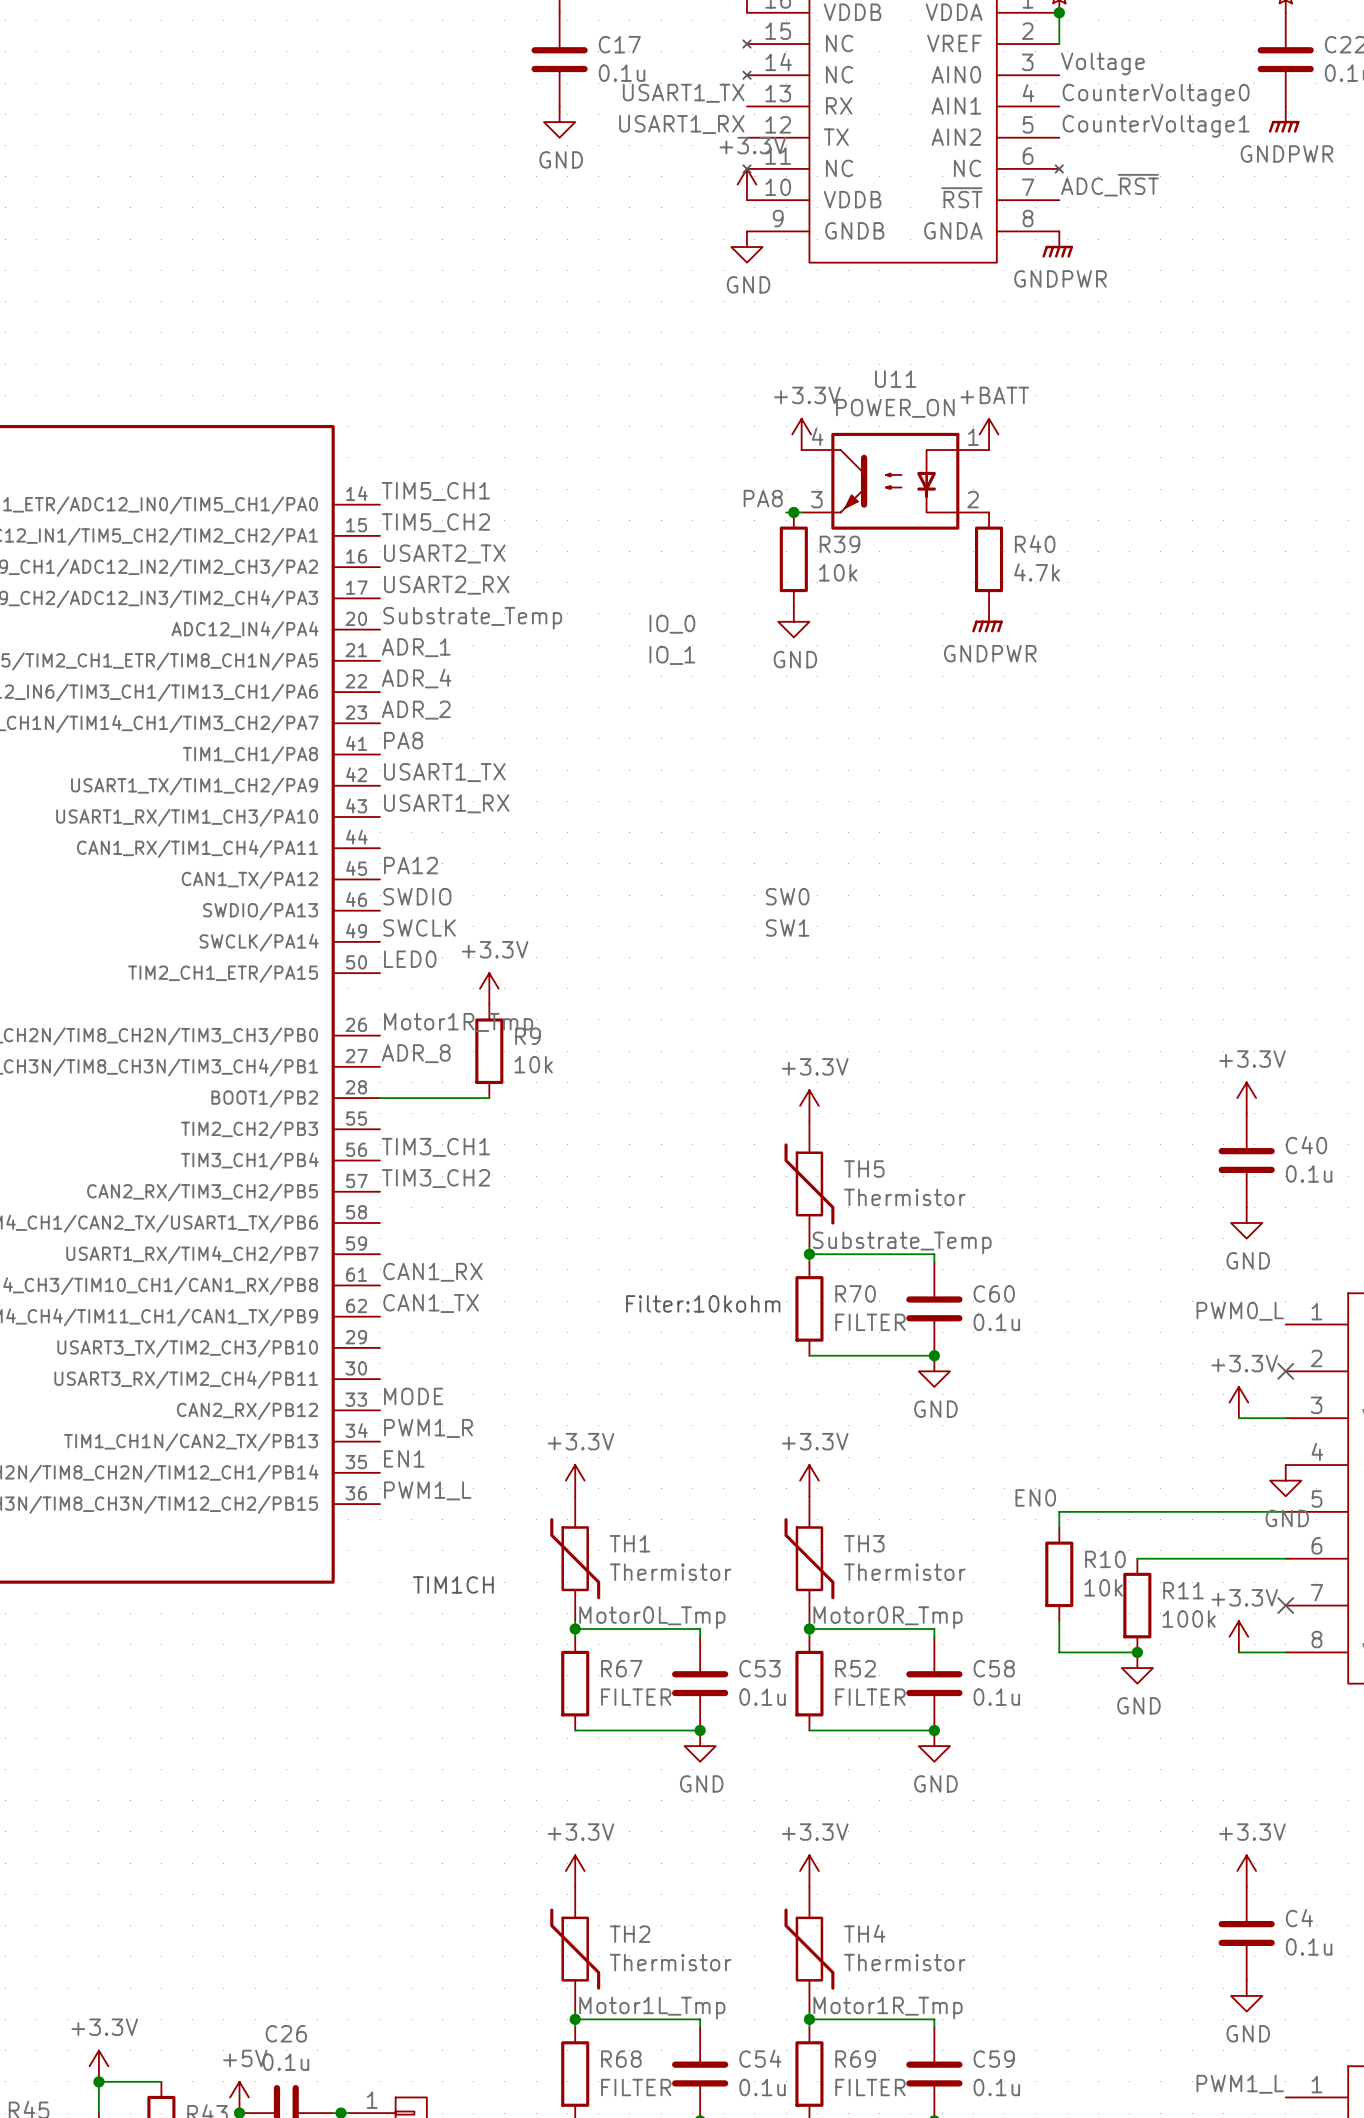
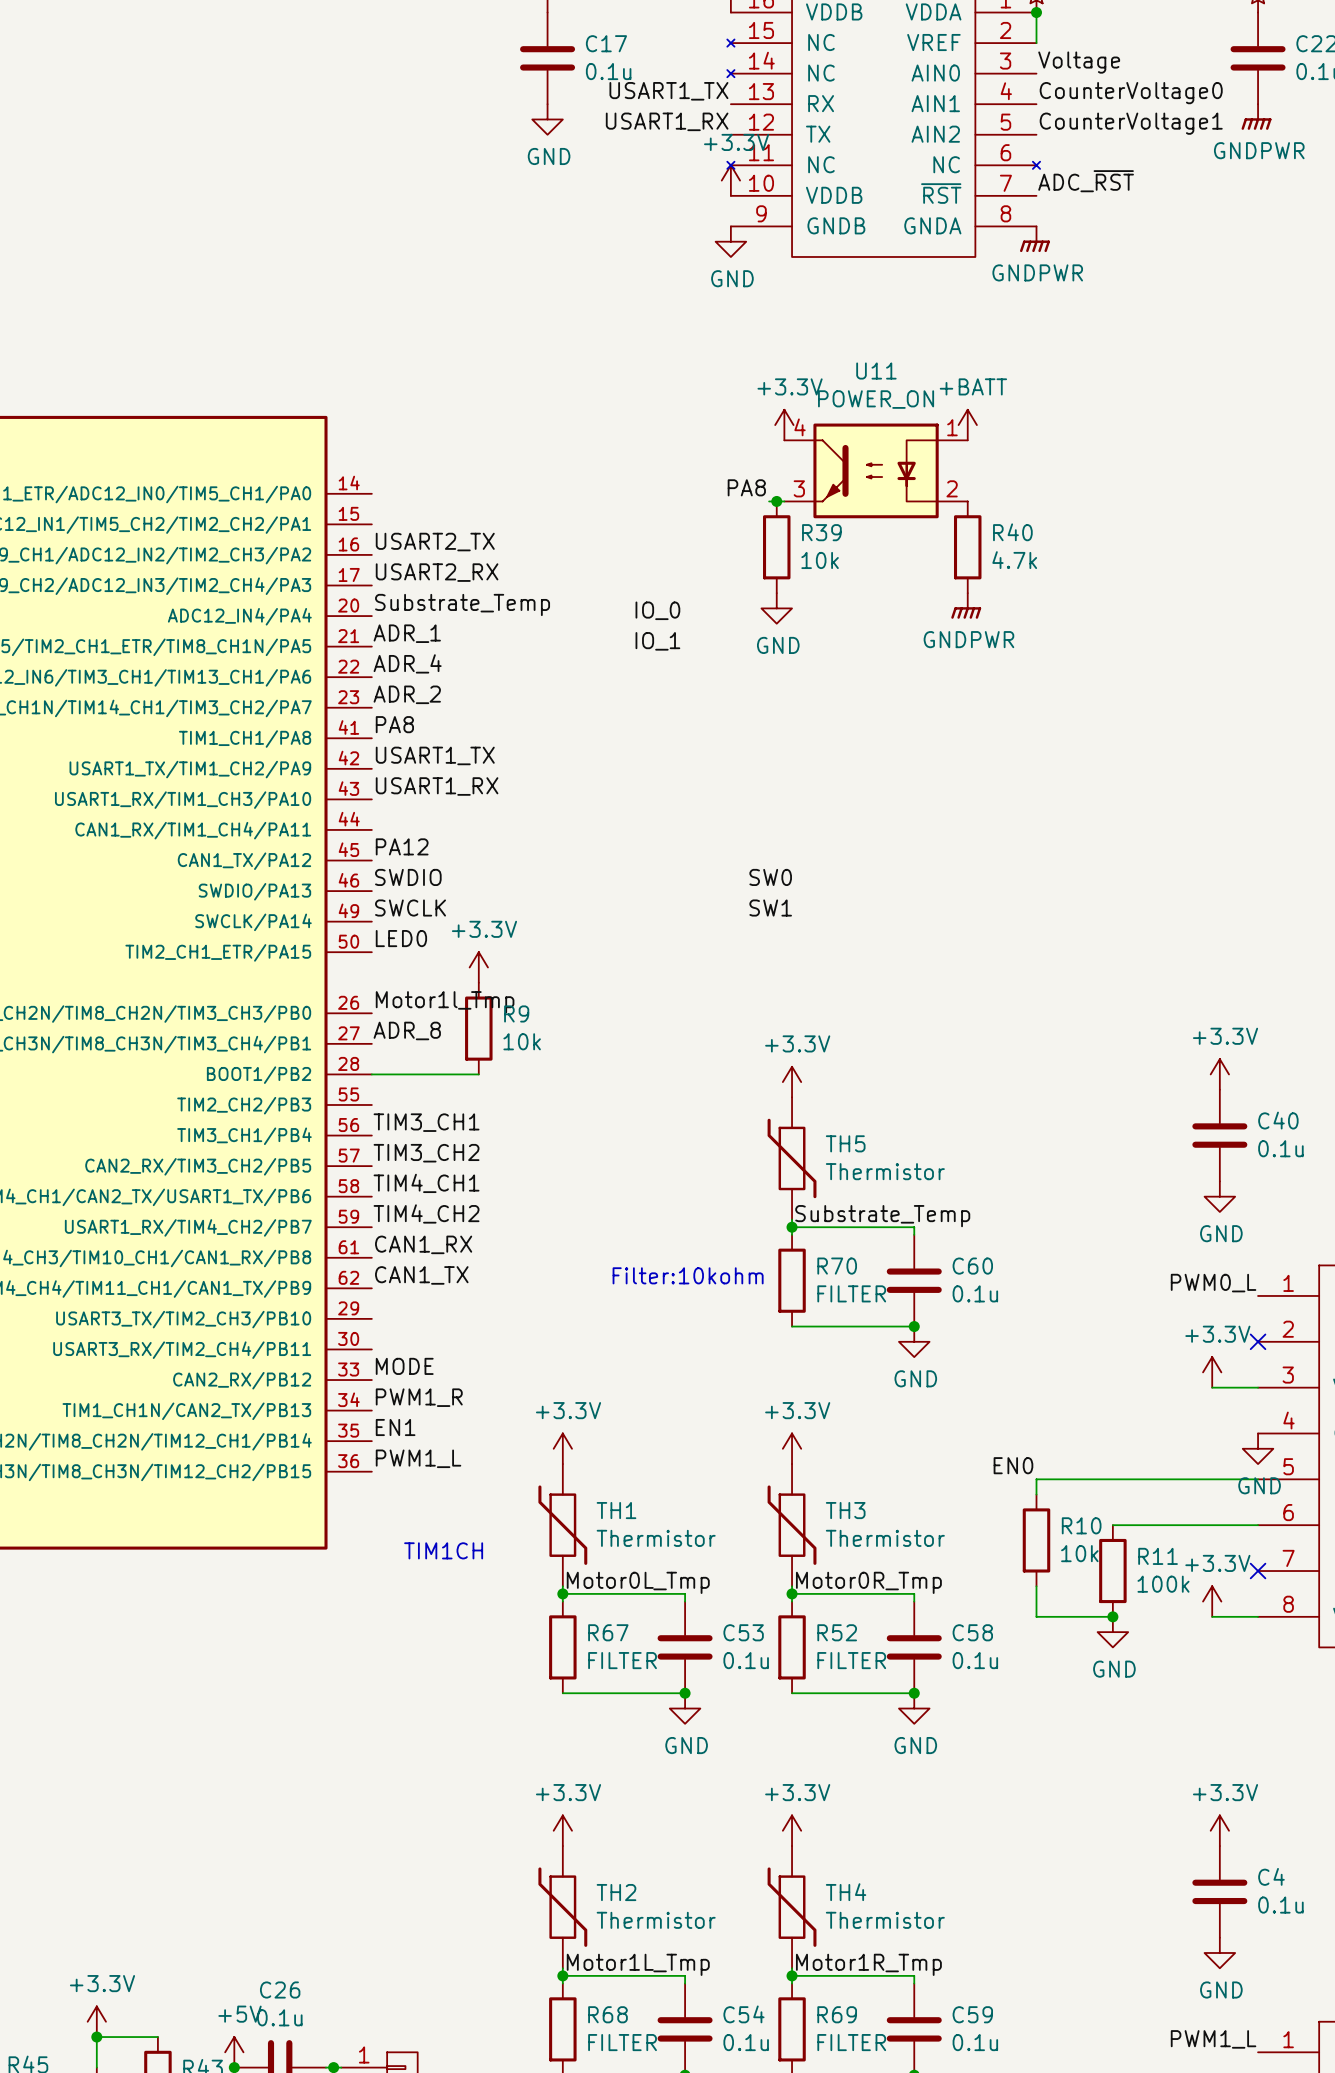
label: TIM5_CH1 (435, 491) -> none
label: TIM5_CH2 (435, 522) -> none
label: Motor1R_Tmp (458, 1024) -> Motor1l_Tmp (445, 1002)
label: none -> TIM4_CH1 (426, 1183)
label: none -> TIM4_CH2 (426, 1213)

